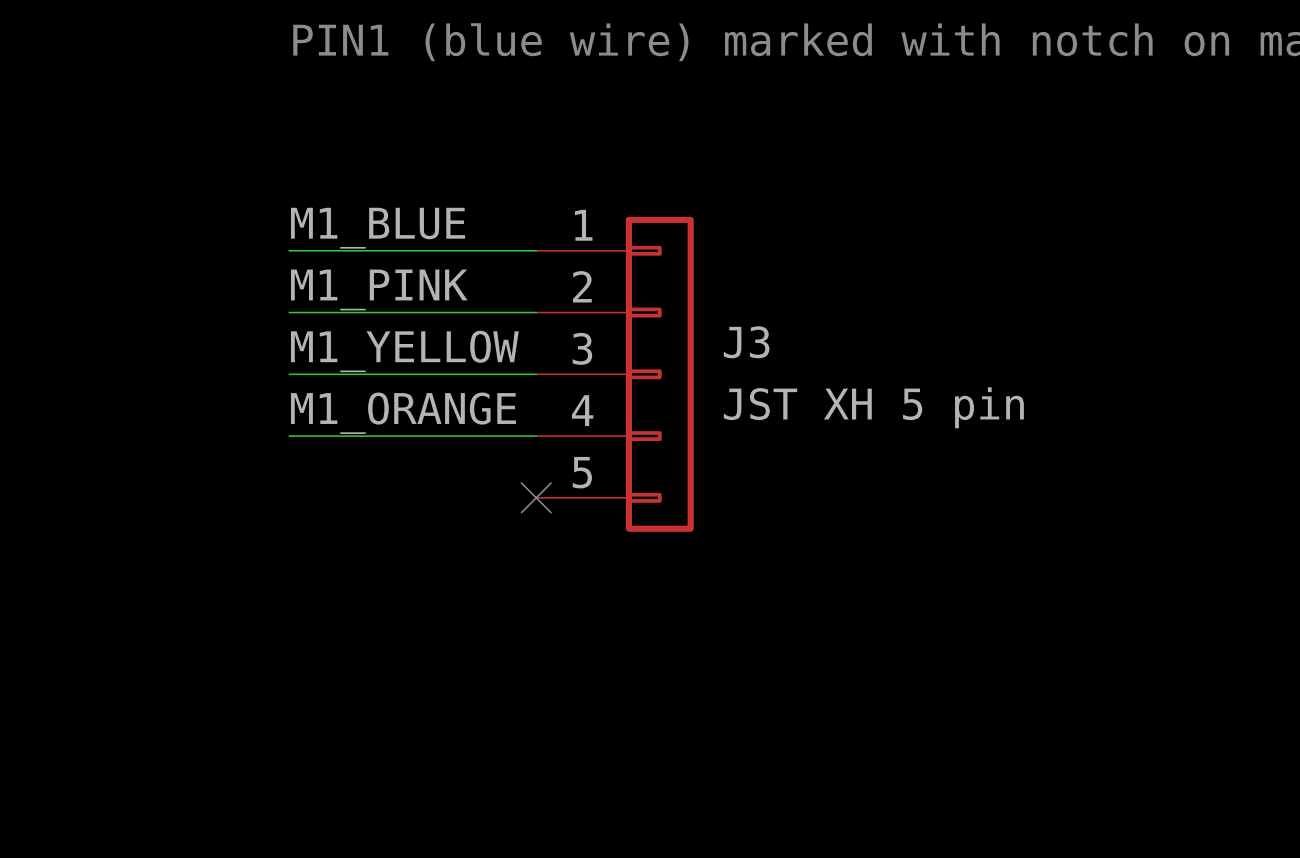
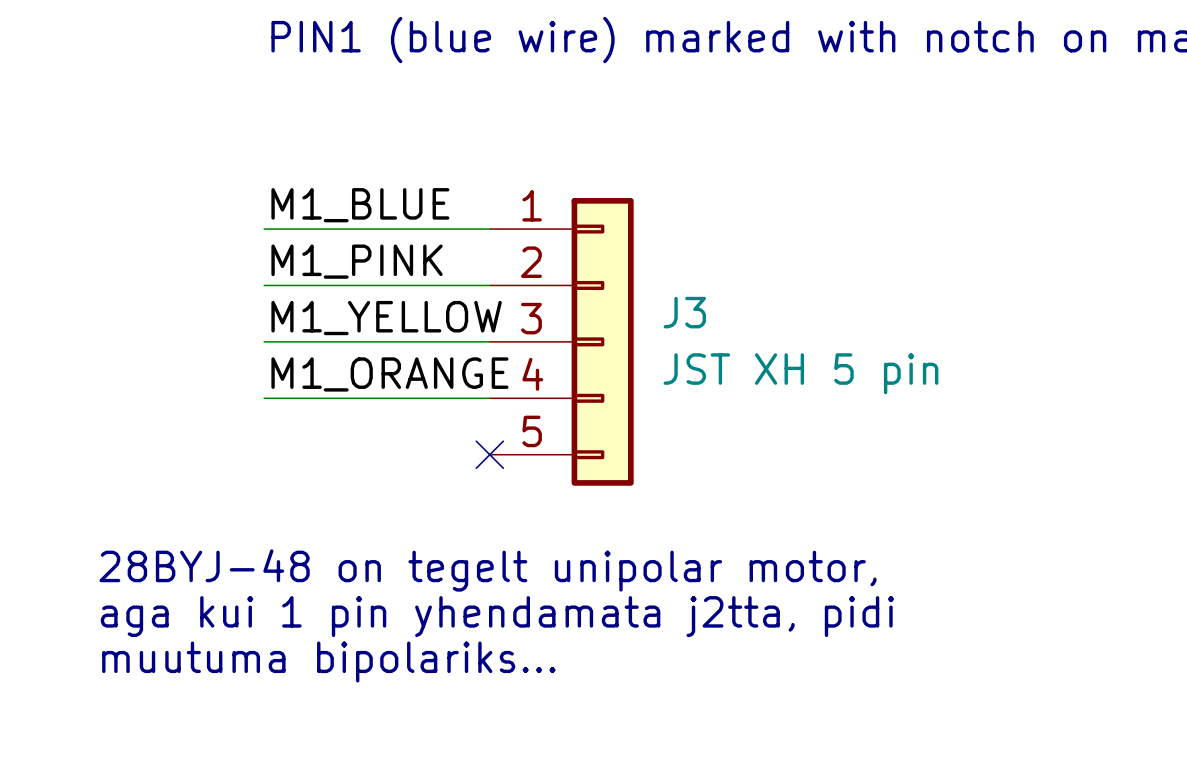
text: none -> 28BYJ-48 on tegelt unipolar motor, (488, 570)
text: none -> aga kui 1 pin yhendamata j2tta, pidi (497, 616)
text: none -> muutuma bipolariks... (328, 661)

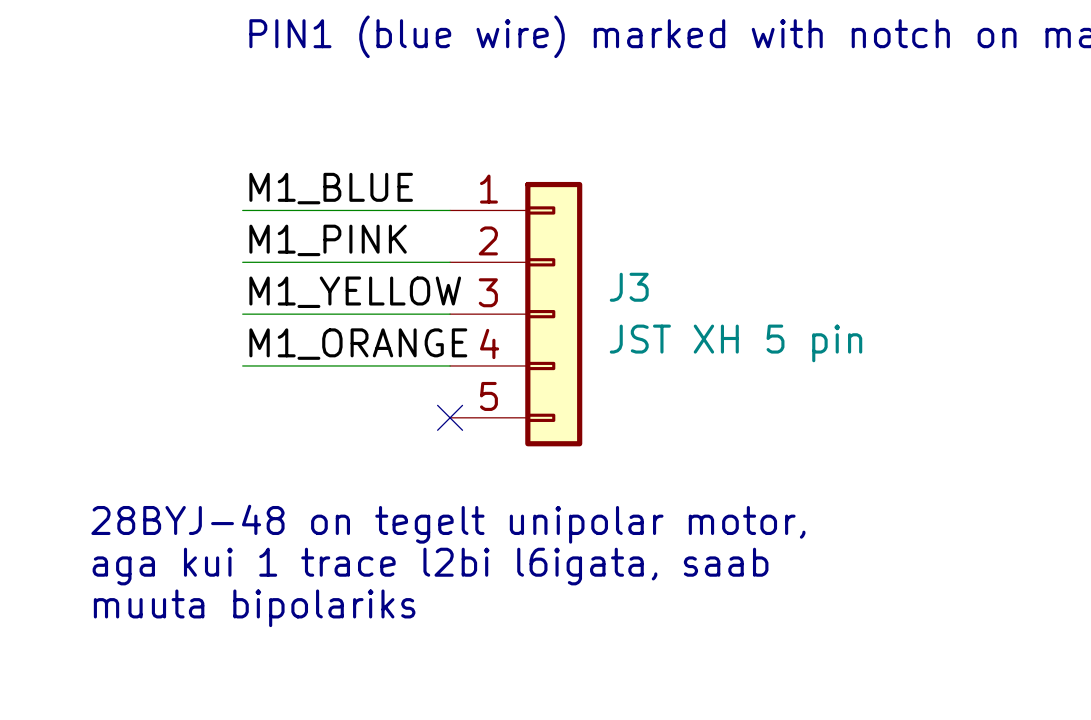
text: aga kui 1 pin yhendamata j2tta, pidi (497, 616) -> aga kui 1 trace l2bi l6igata, saab (430, 566)
text: muutuma bipolariks... (328, 661) -> muuta bipolariks (254, 608)

